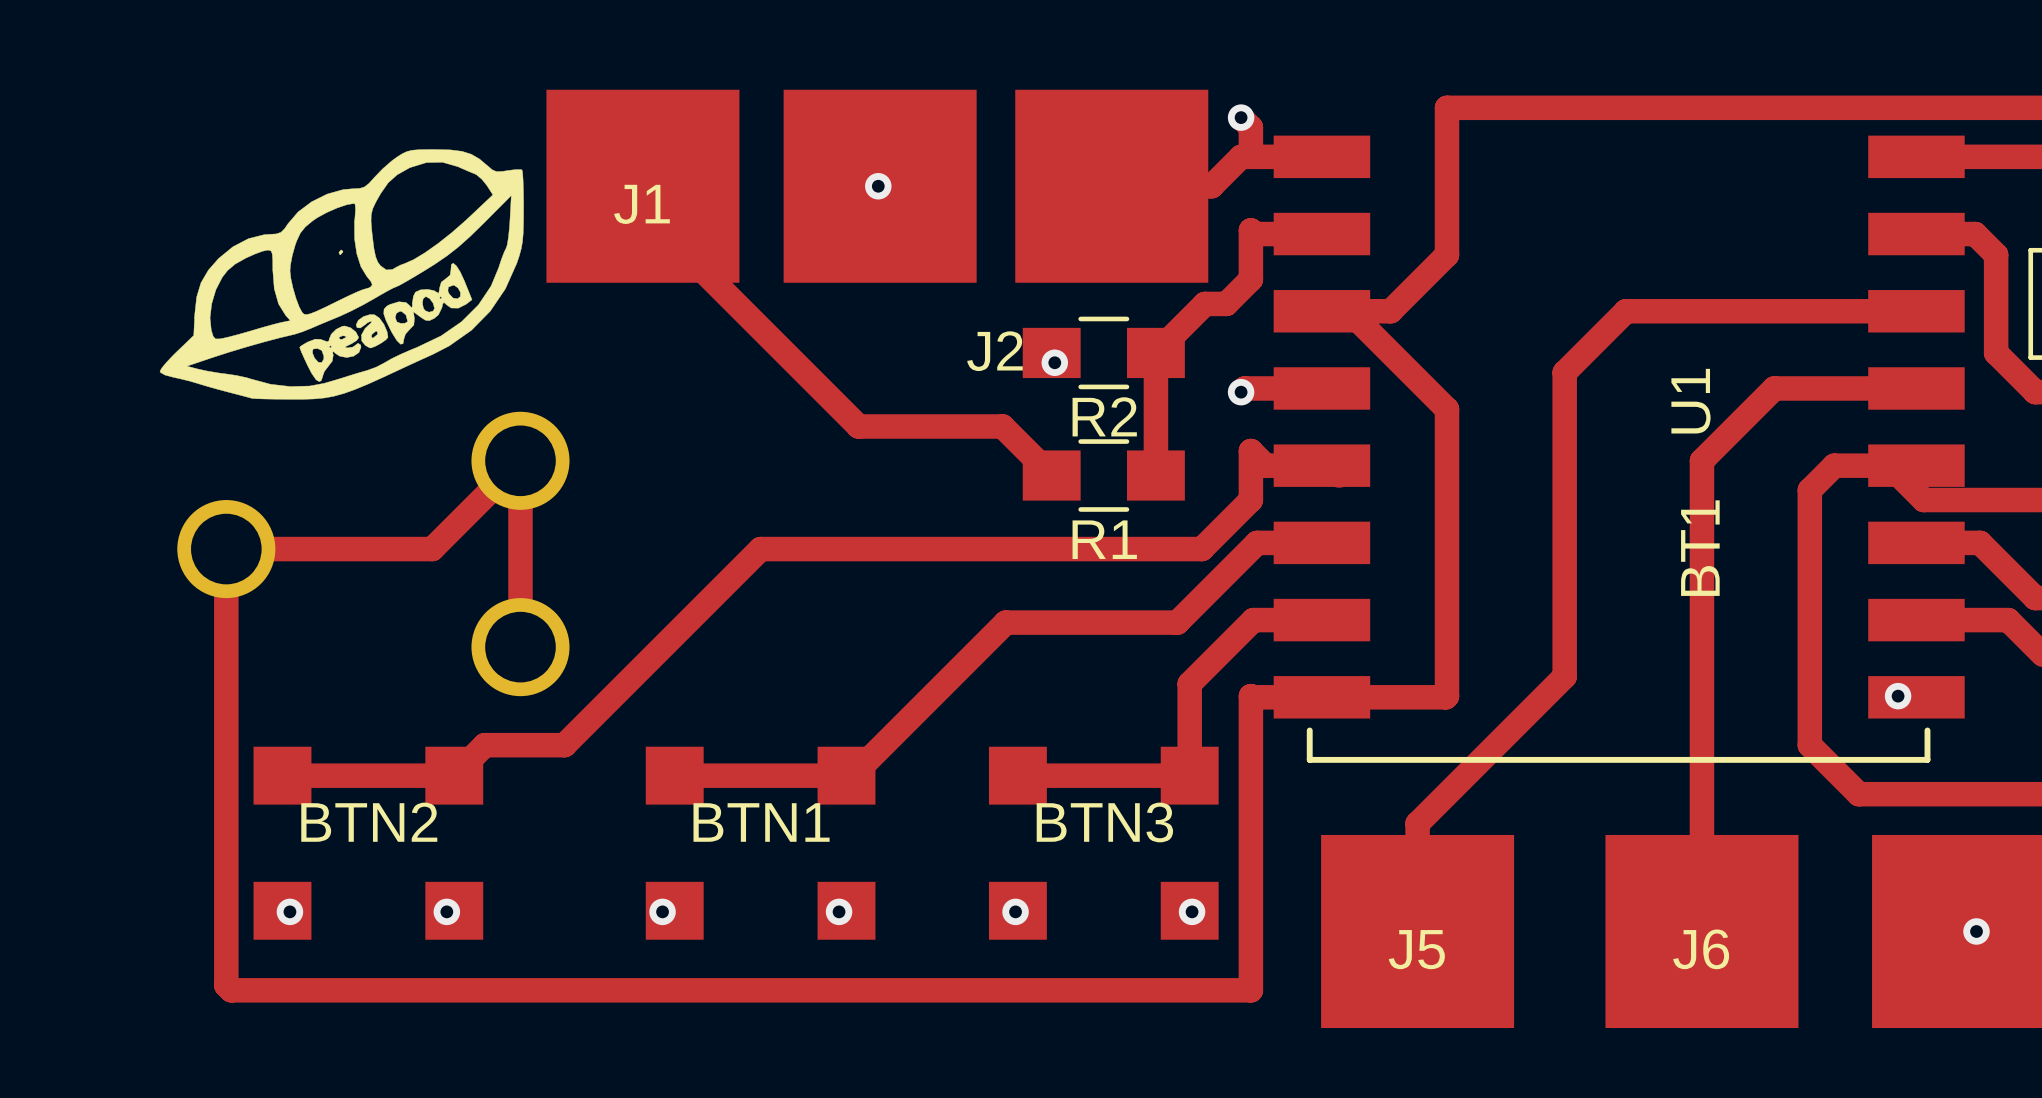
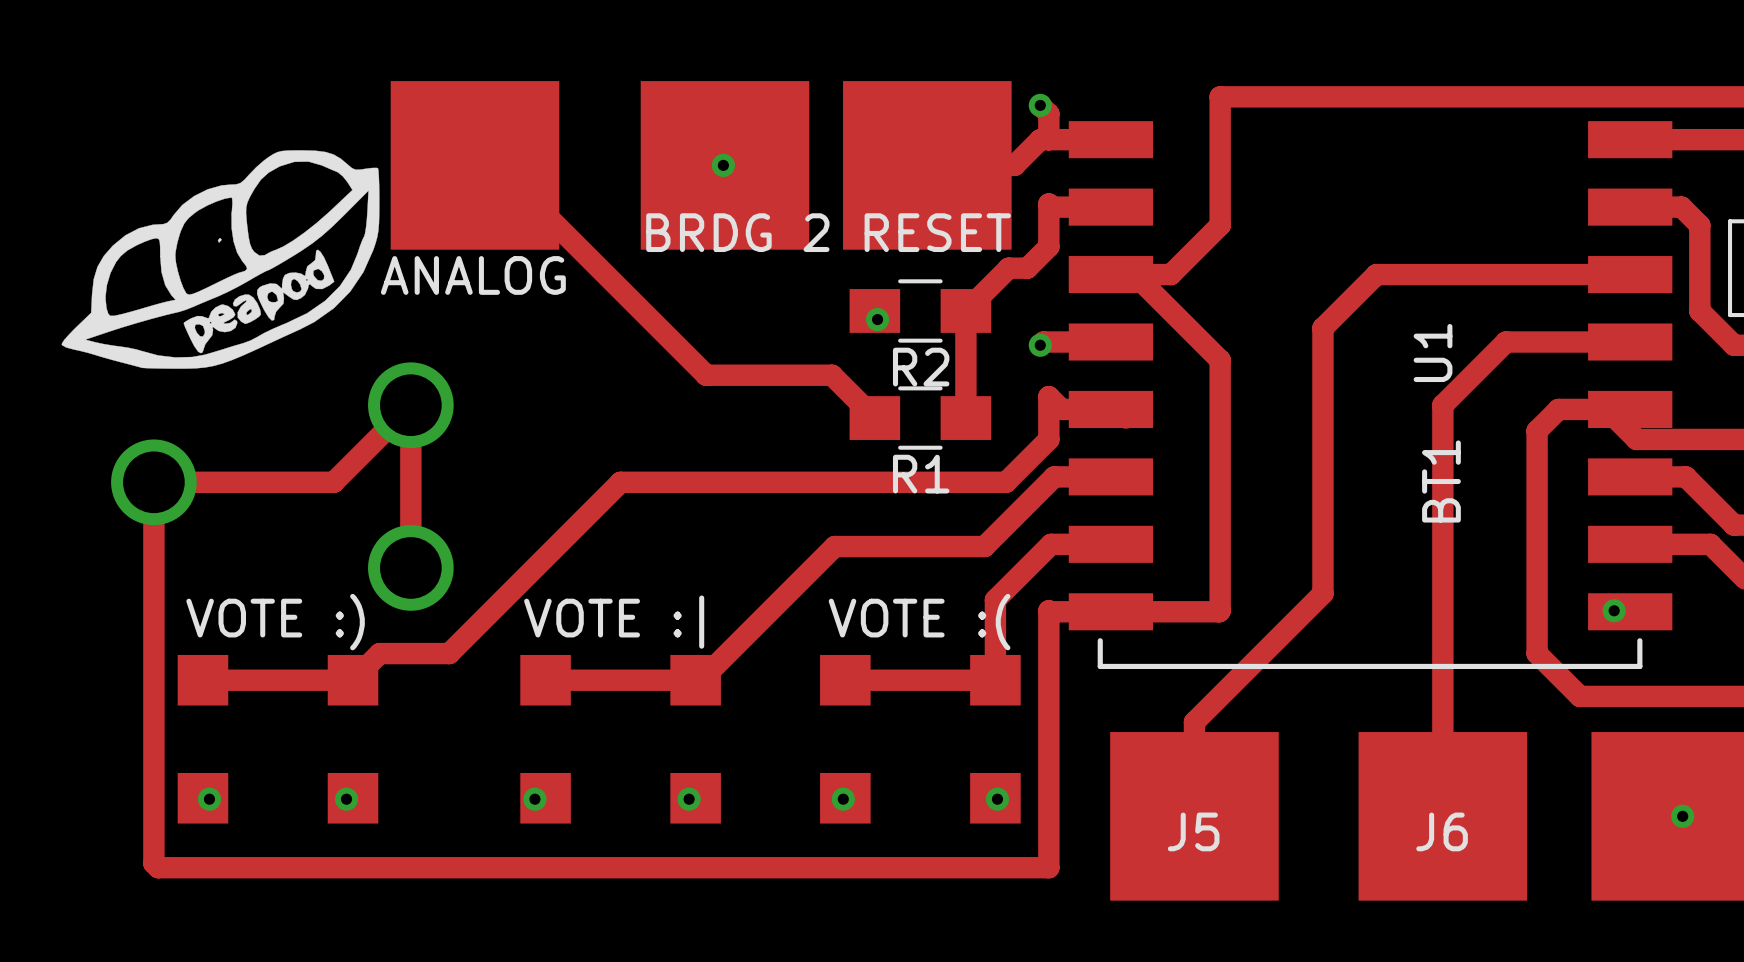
ANALOG: none -> (474, 165)
J1: (642, 186) -> none
drawing position: (341, 274) -> (220, 259)
J2 name: J2 (994, 351) -> BRDG 2 RESET (828, 232)
BTN2 name: BTN2 (369, 822) -> VOTE :) (275, 622)
BTN1 name: BTN1 (761, 822) -> VOTE :| (614, 622)
BTN3 name: BTN3 (1104, 822) -> VOTE :( (919, 622)

